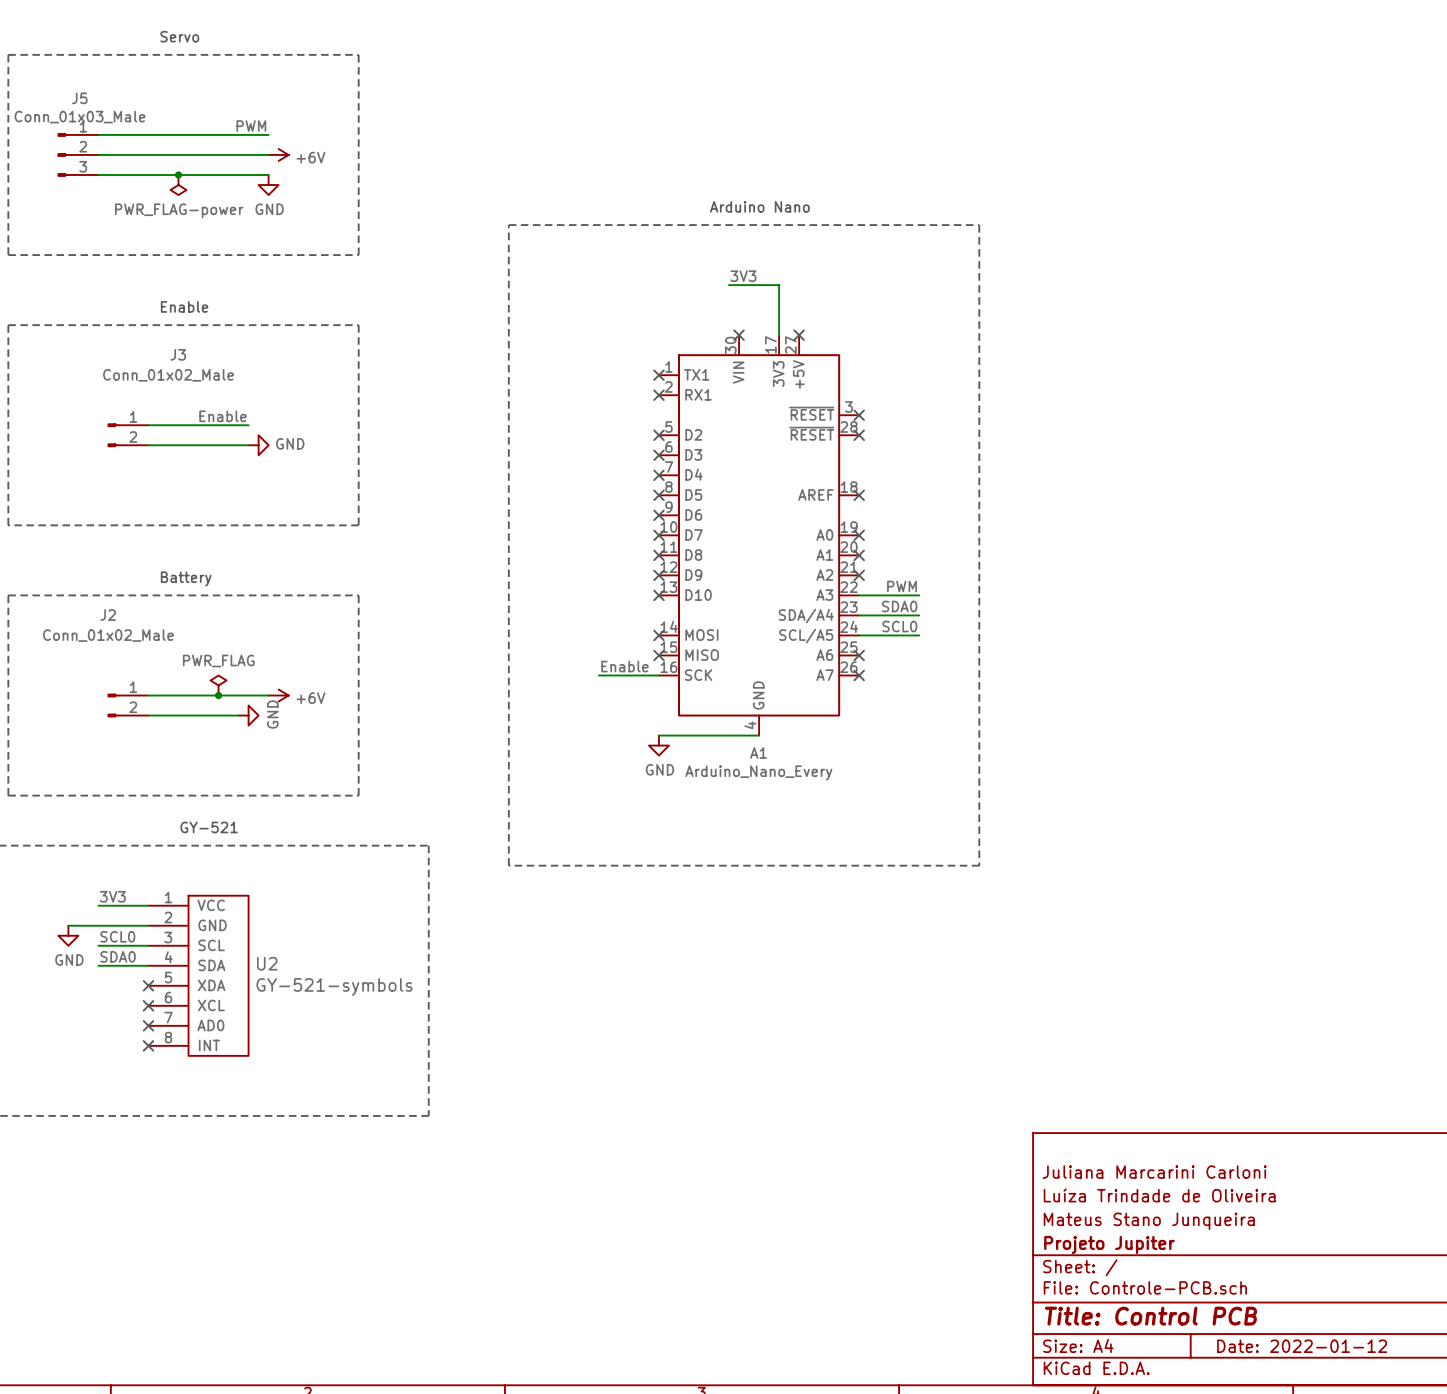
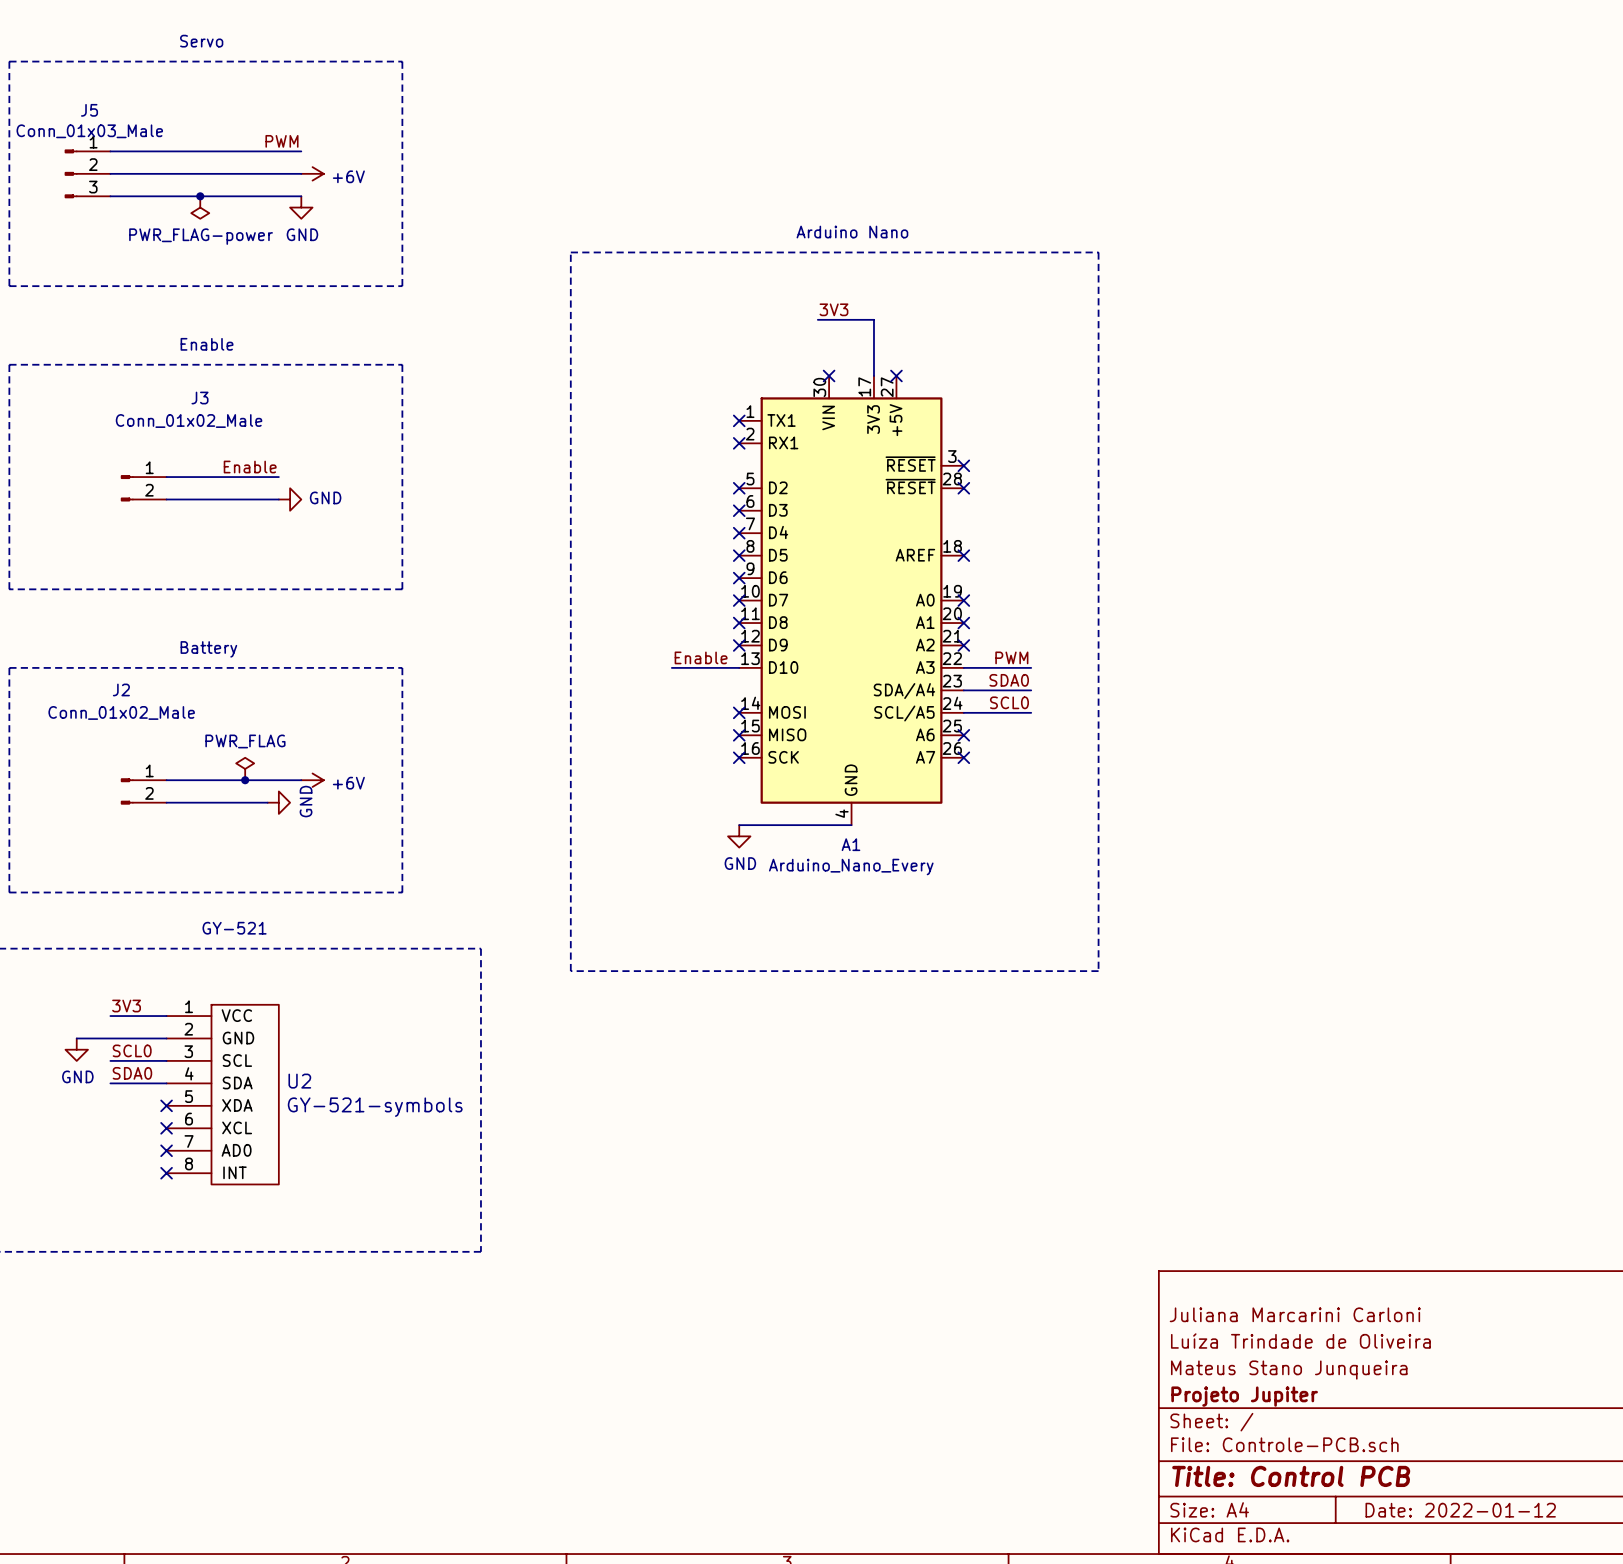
no-connect mark: (658, 595) -> none
label position: Enable (624, 666) -> Enable (701, 657)
wire: (598, 675) (658, 675) -> (671, 667) (739, 667)
no-connect mark: none -> (739, 757)

